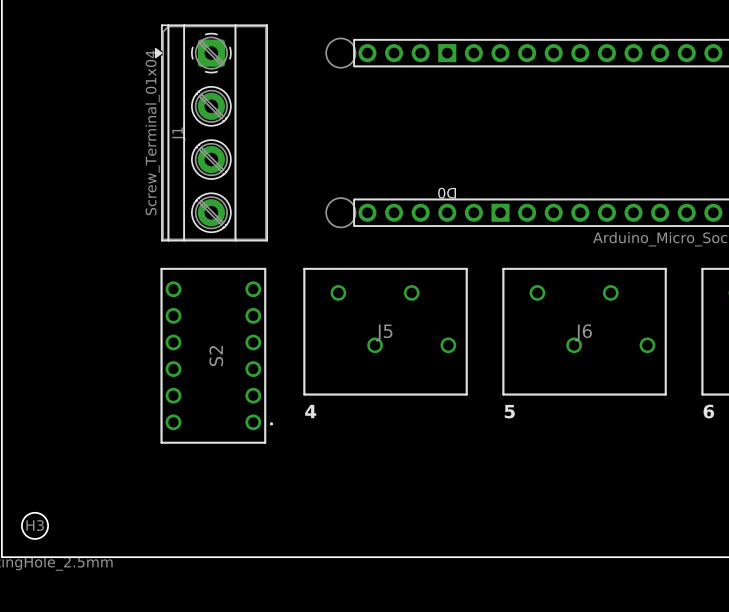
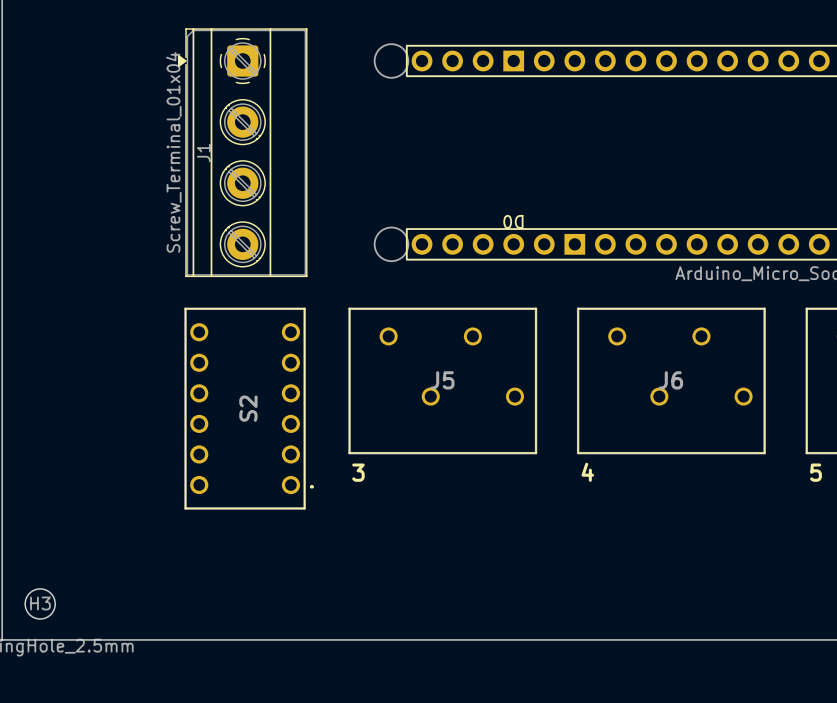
text: 4 (310, 411) -> 3 (358, 472)
text: 5 (509, 411) -> 4 (587, 472)
text: 6 (708, 411) -> 5 (816, 472)

